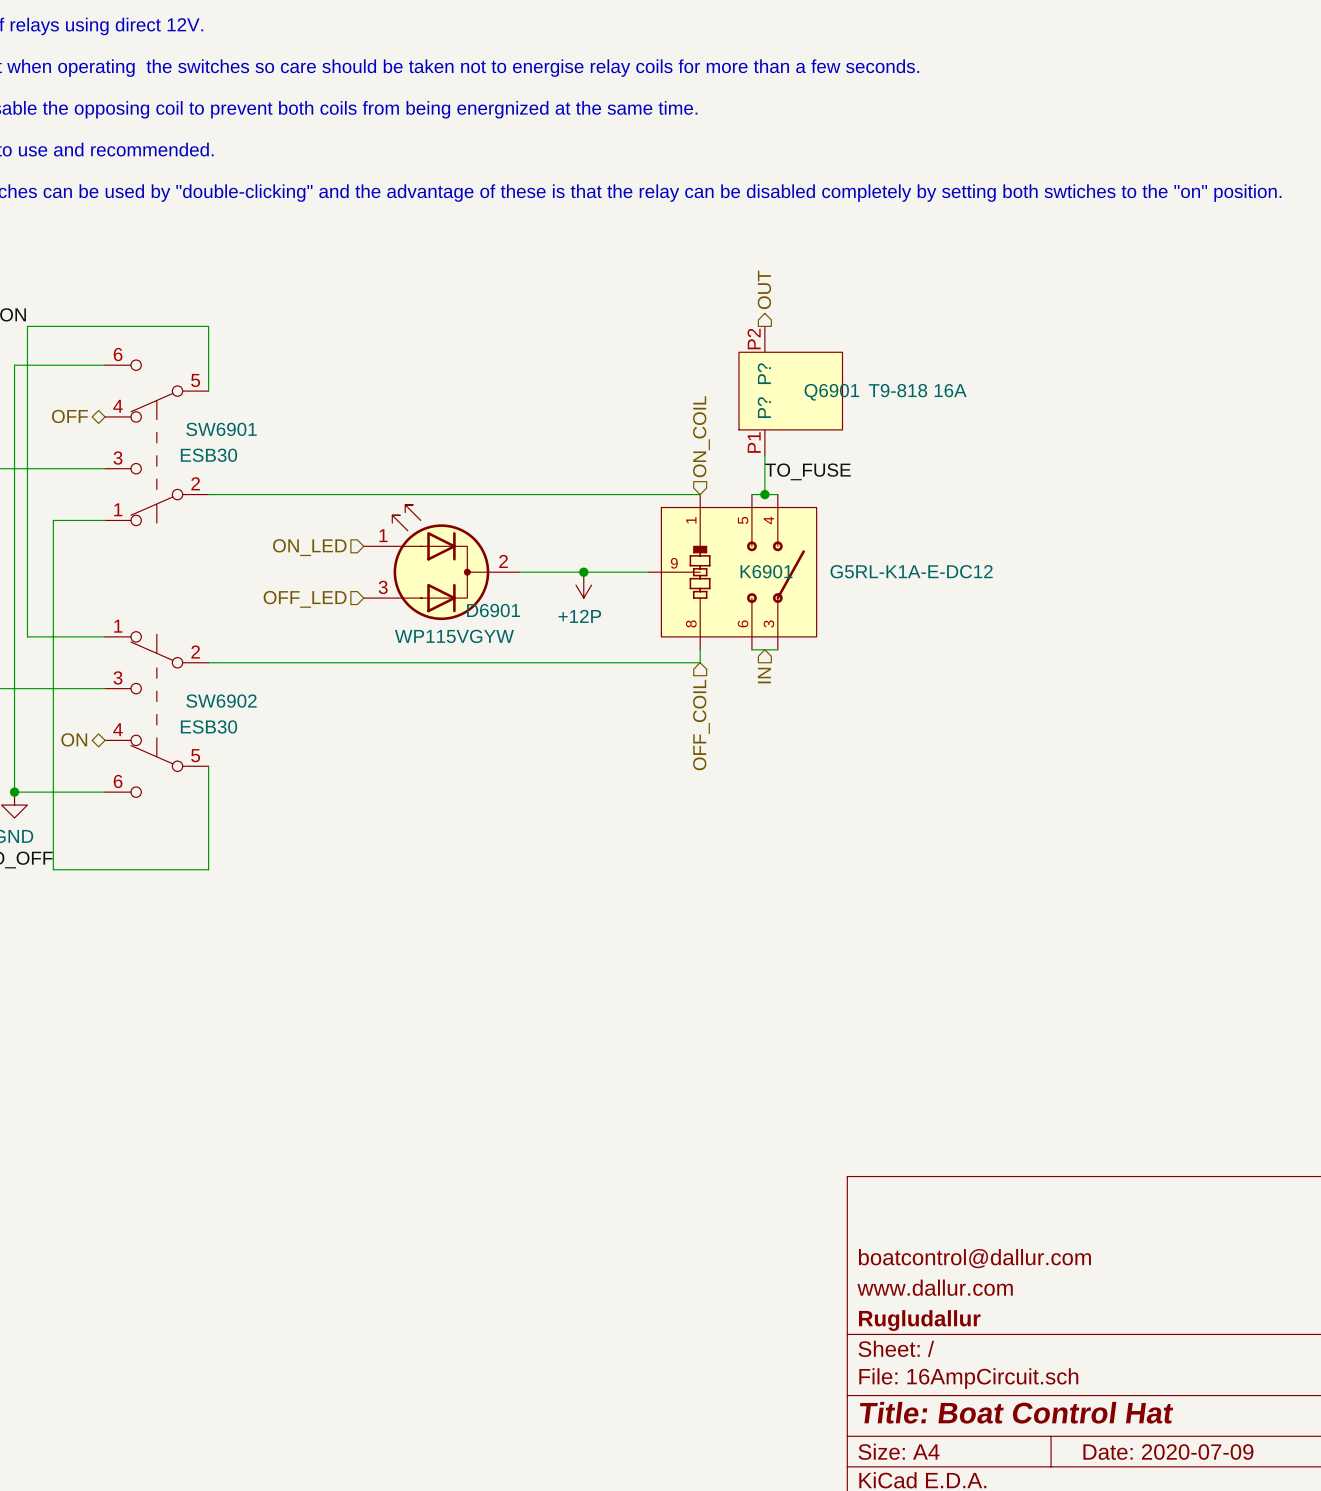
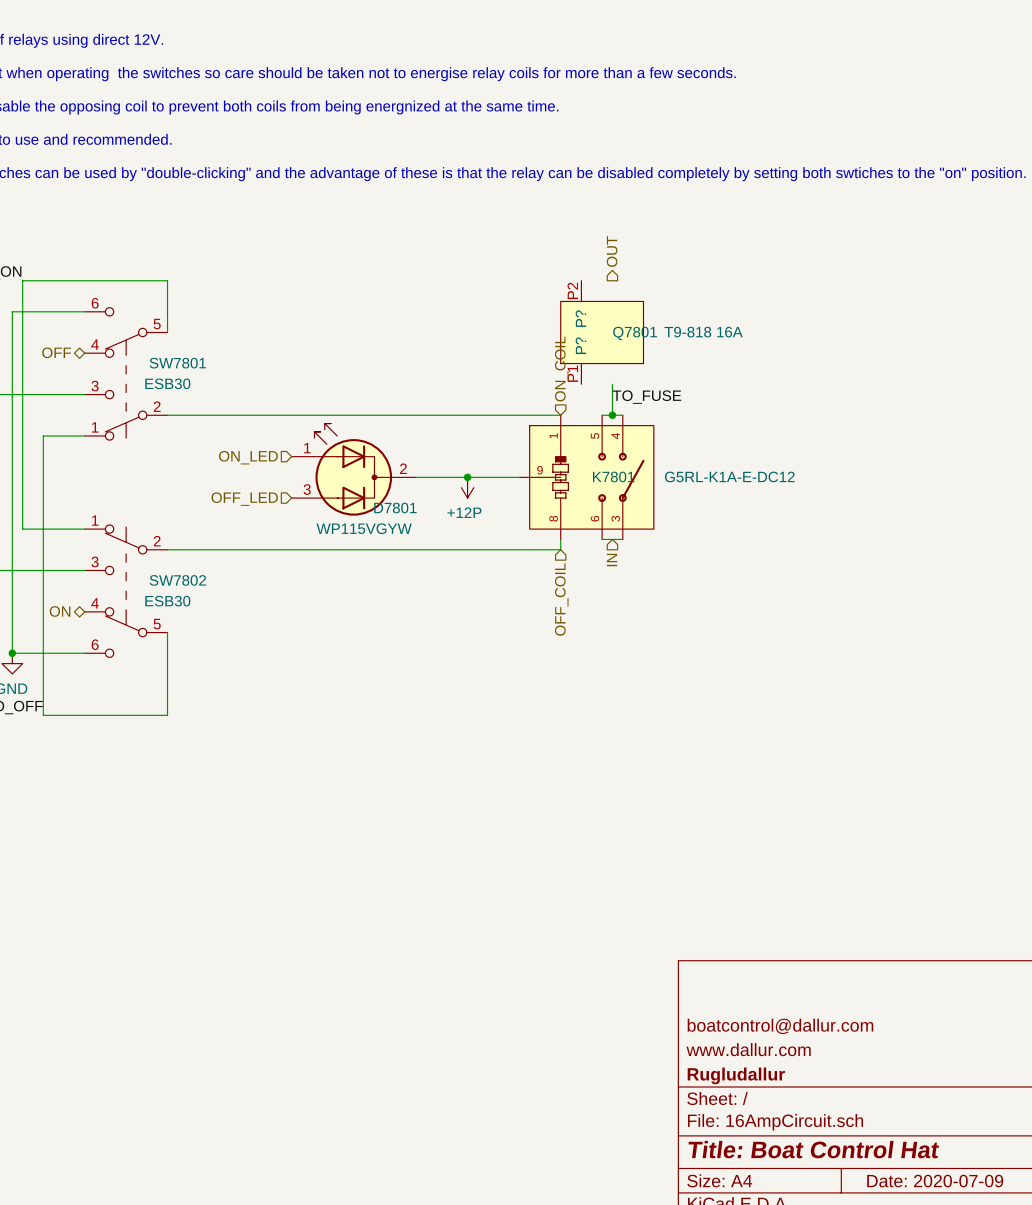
Q7801: none -> T9-818 16A (602, 332)
Q6901: T9-818 16A (790, 391) -> none
SW6901 name: SW6901 (221, 429) -> SW7801 (177, 363)
K6901 name: K6901 (766, 571) -> K7801 (613, 476)
D6901 name: D6901 (493, 610) -> D7801 (395, 508)
SW6902 name: SW6902 (221, 701) -> SW7802 (177, 580)

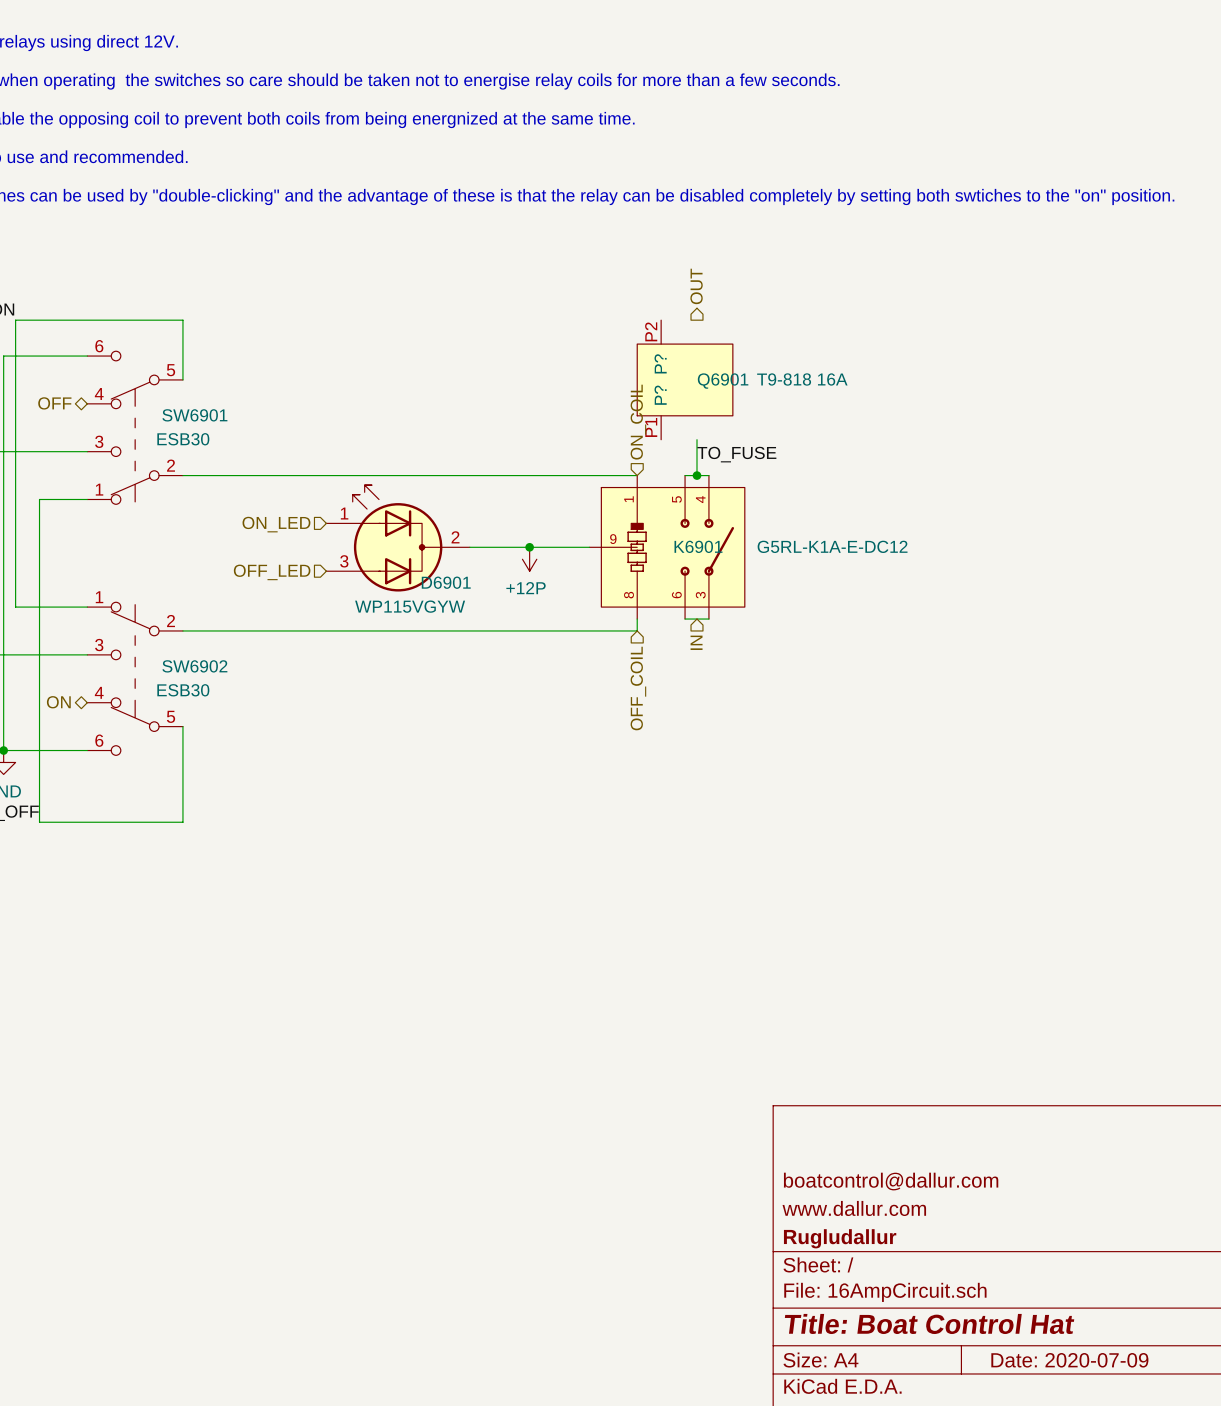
Q7801 name: Q7801 (635, 333) -> Q6901 (723, 381)
SW7801 name: SW7801 (177, 363) -> SW6901 (194, 415)
K7801 name: K7801 (613, 476) -> K6901 (698, 546)
D7801 name: D7801 (395, 508) -> D6901 (446, 582)
SW7802 name: SW7802 (177, 580) -> SW6902 (194, 666)

